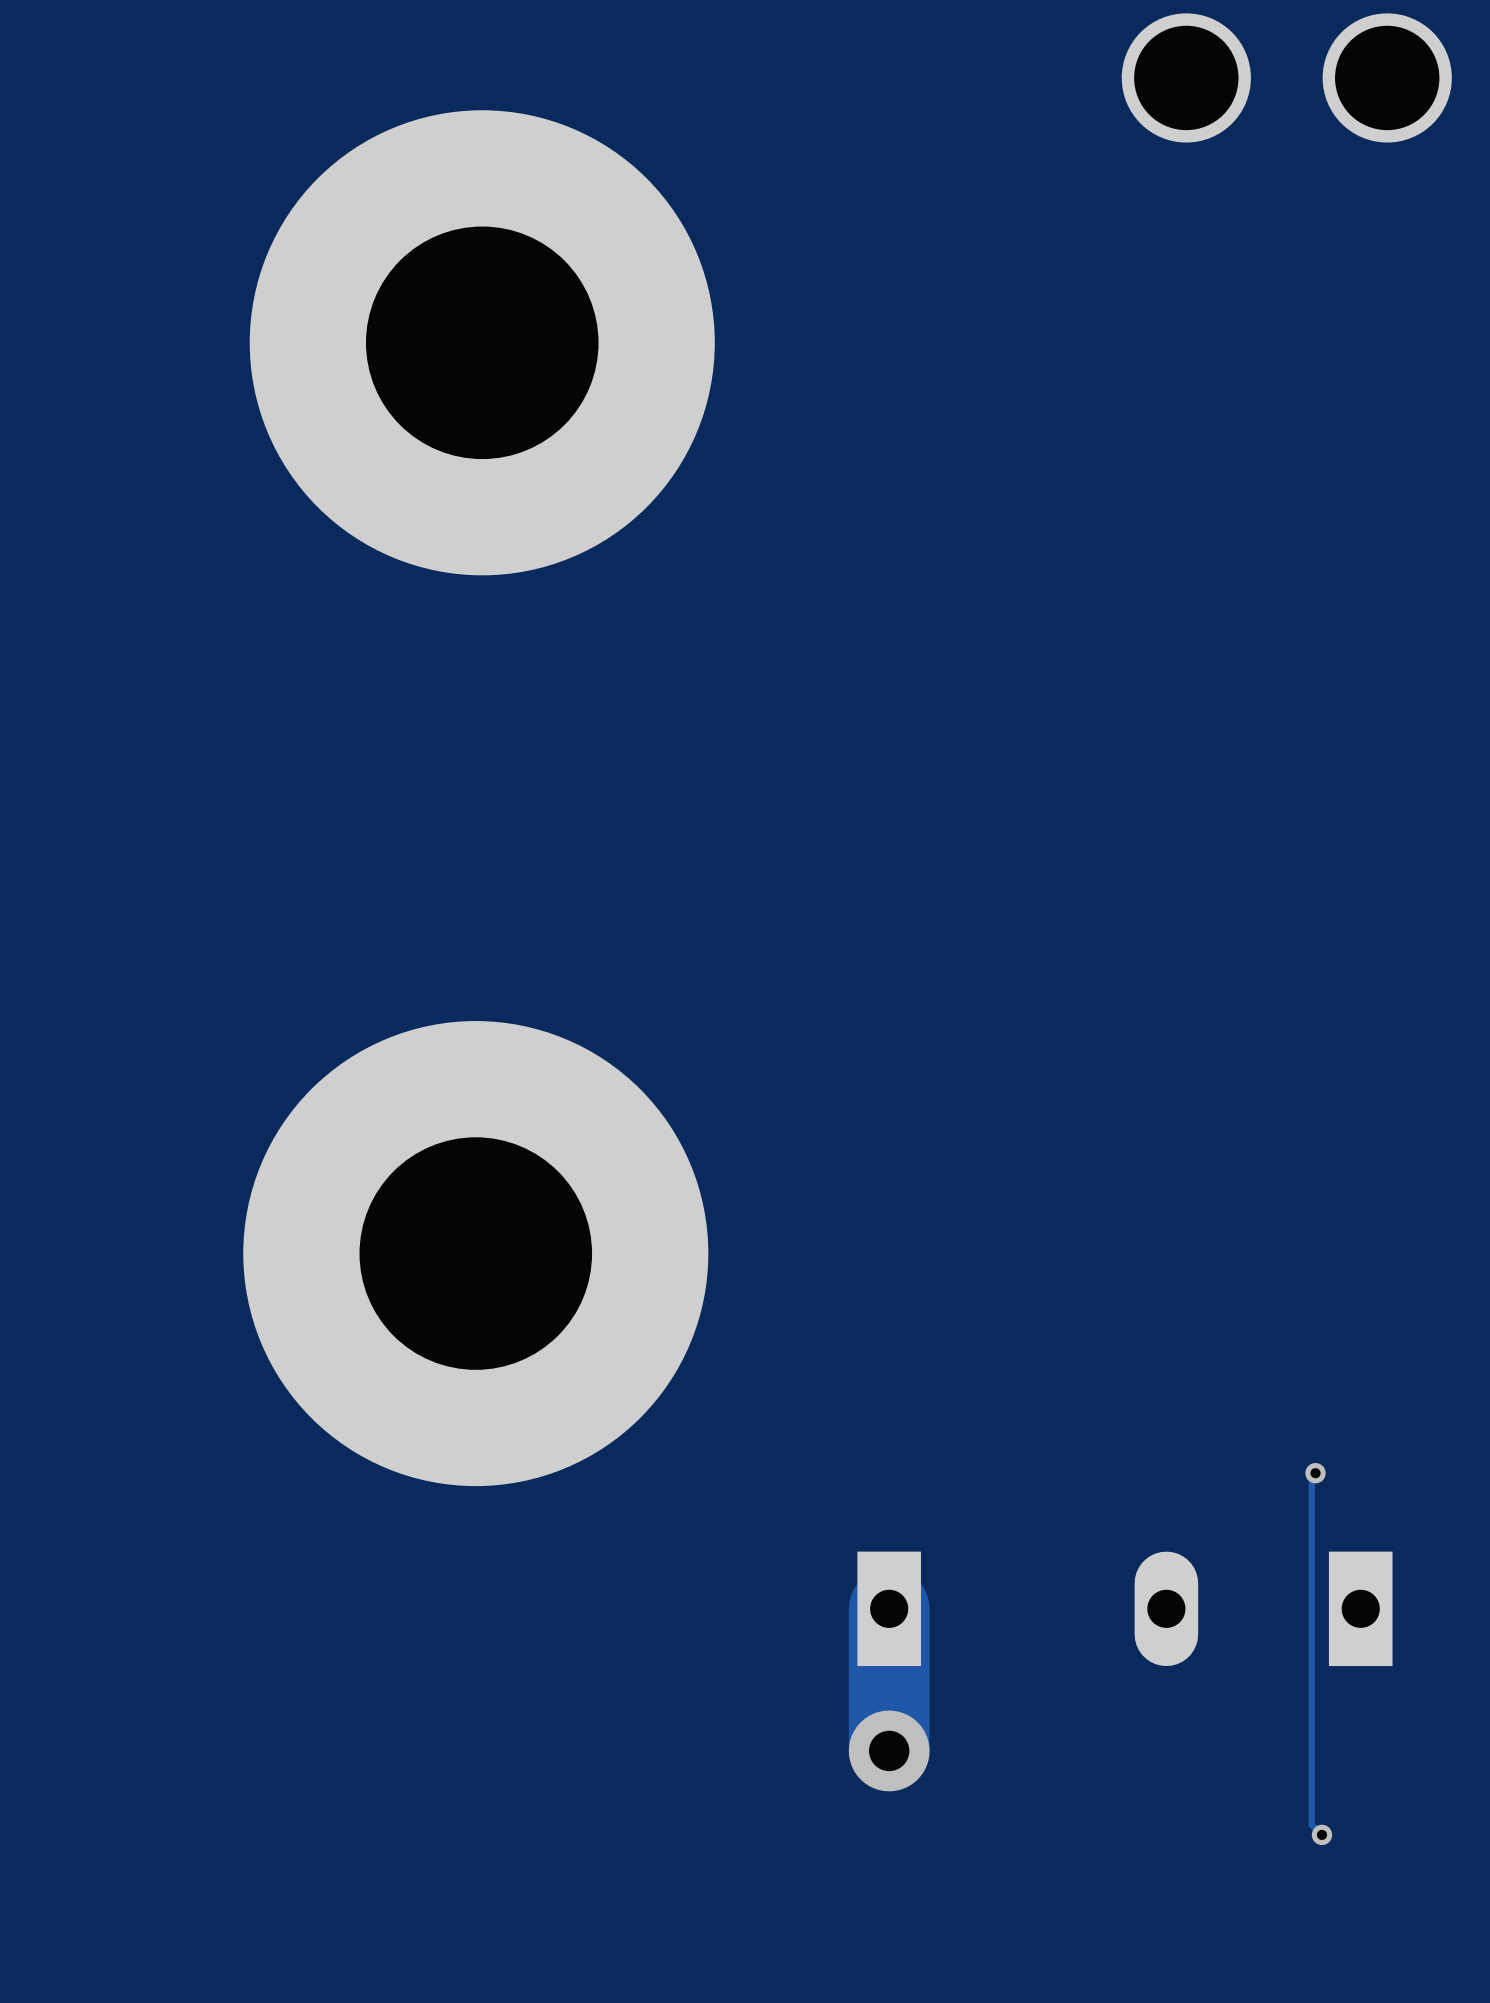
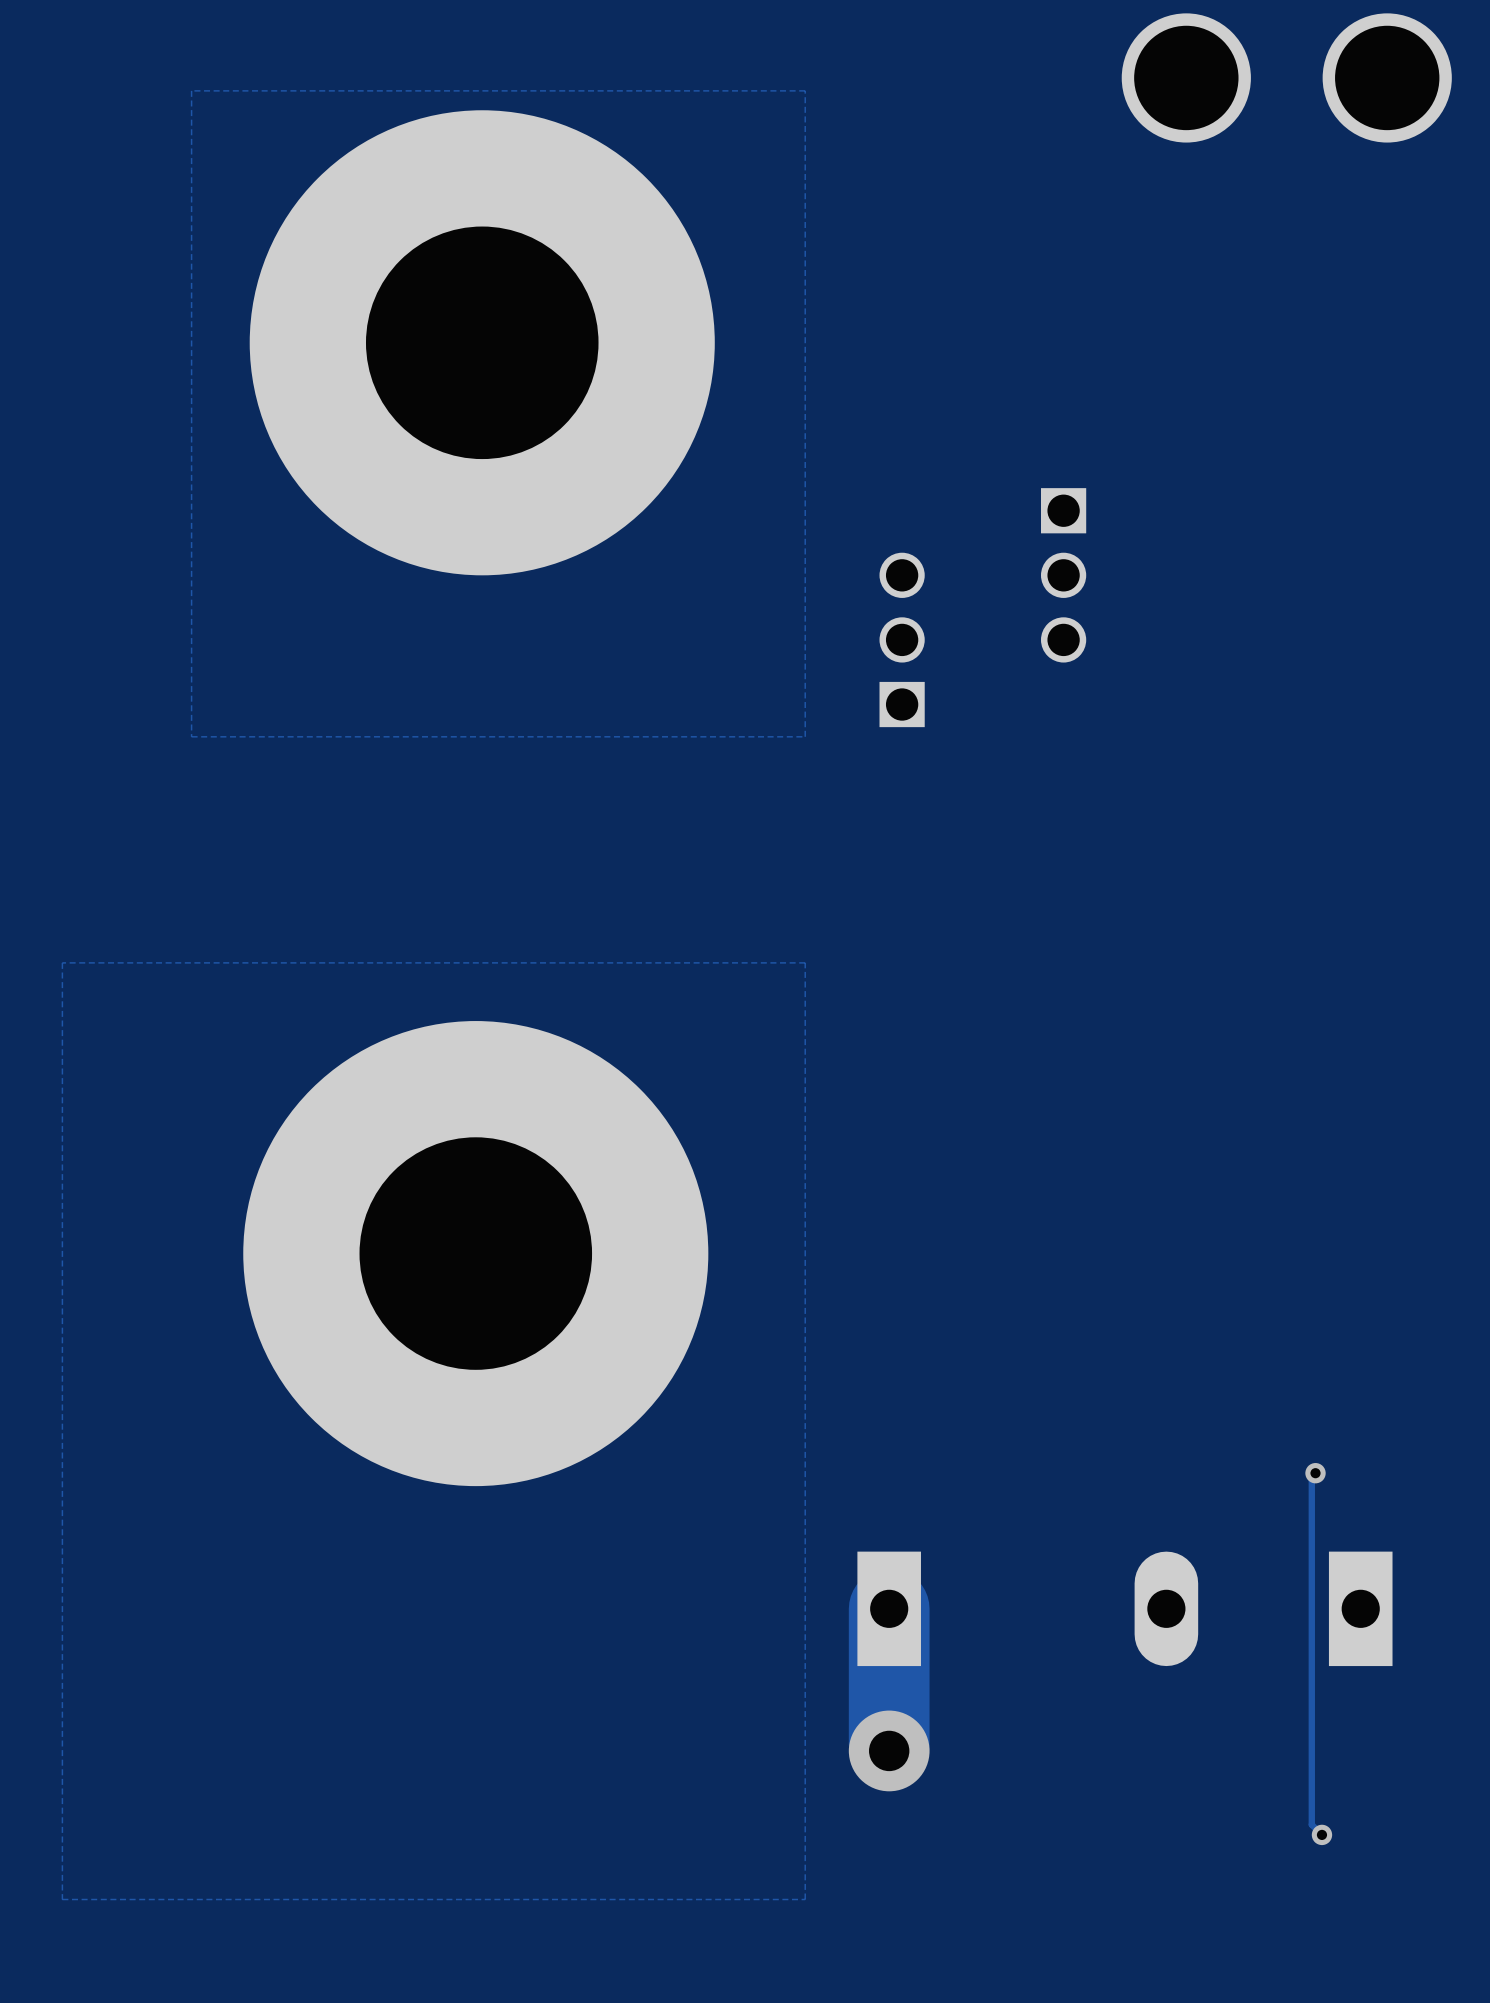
zone outline: none -> (805, 90) (805, 736) (191, 736) (191, 90) (805, 90)
part: none -> (1063, 575)
part: none -> (902, 639)
zone outline: none -> (805, 962) (805, 1899) (62, 1899) (62, 962) (805, 962)

